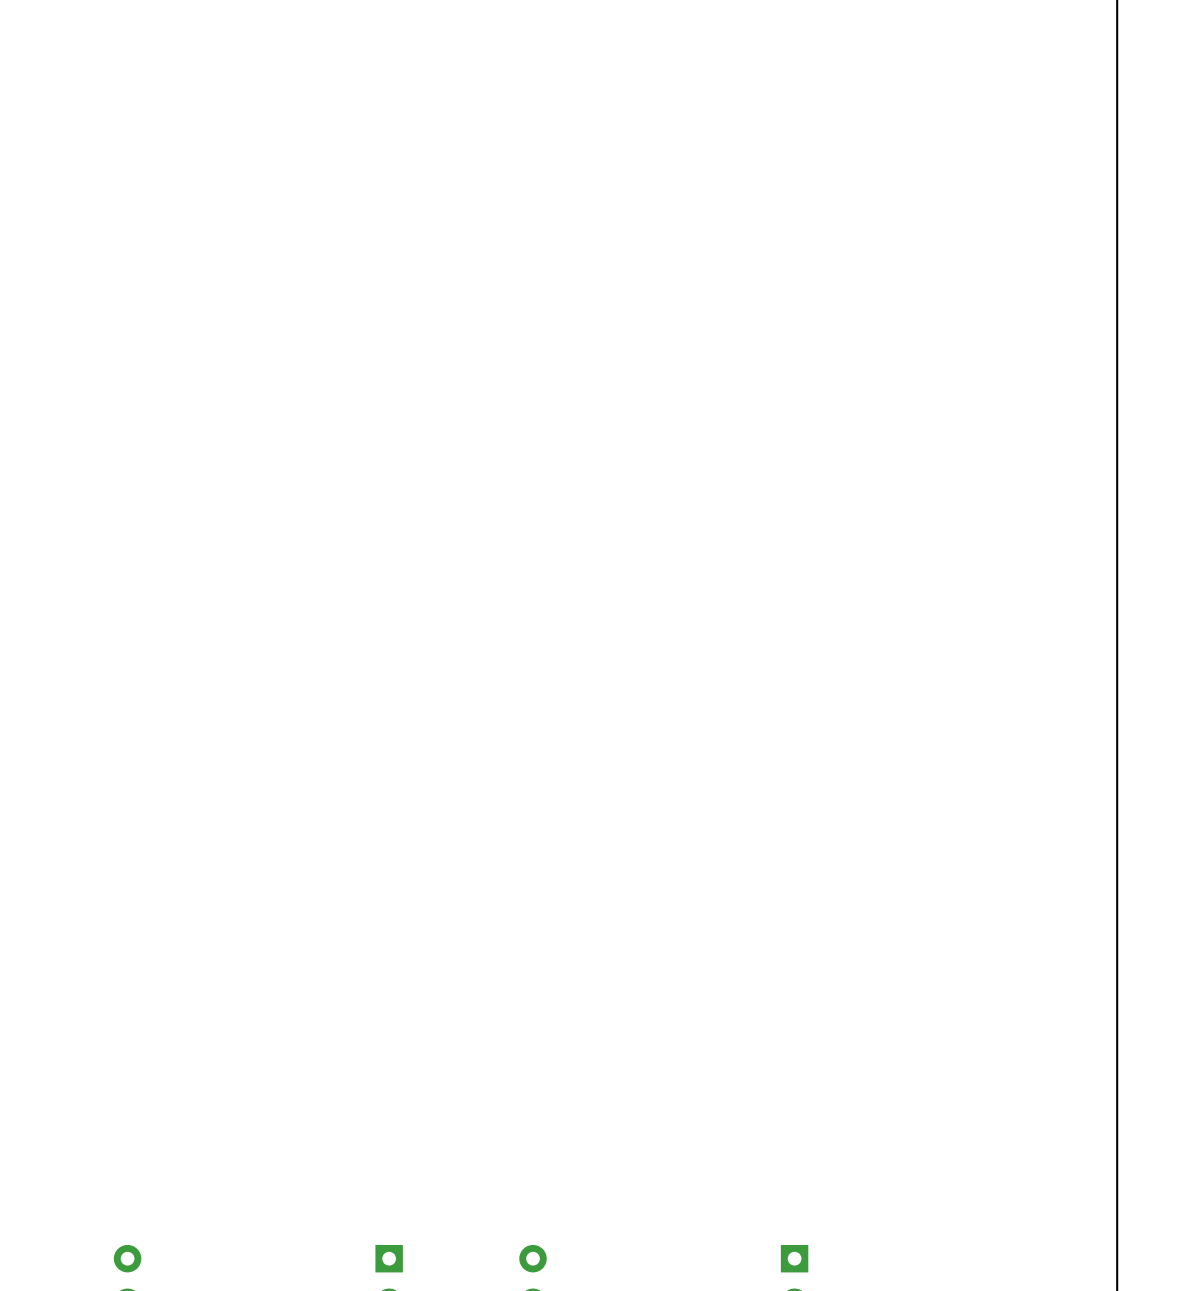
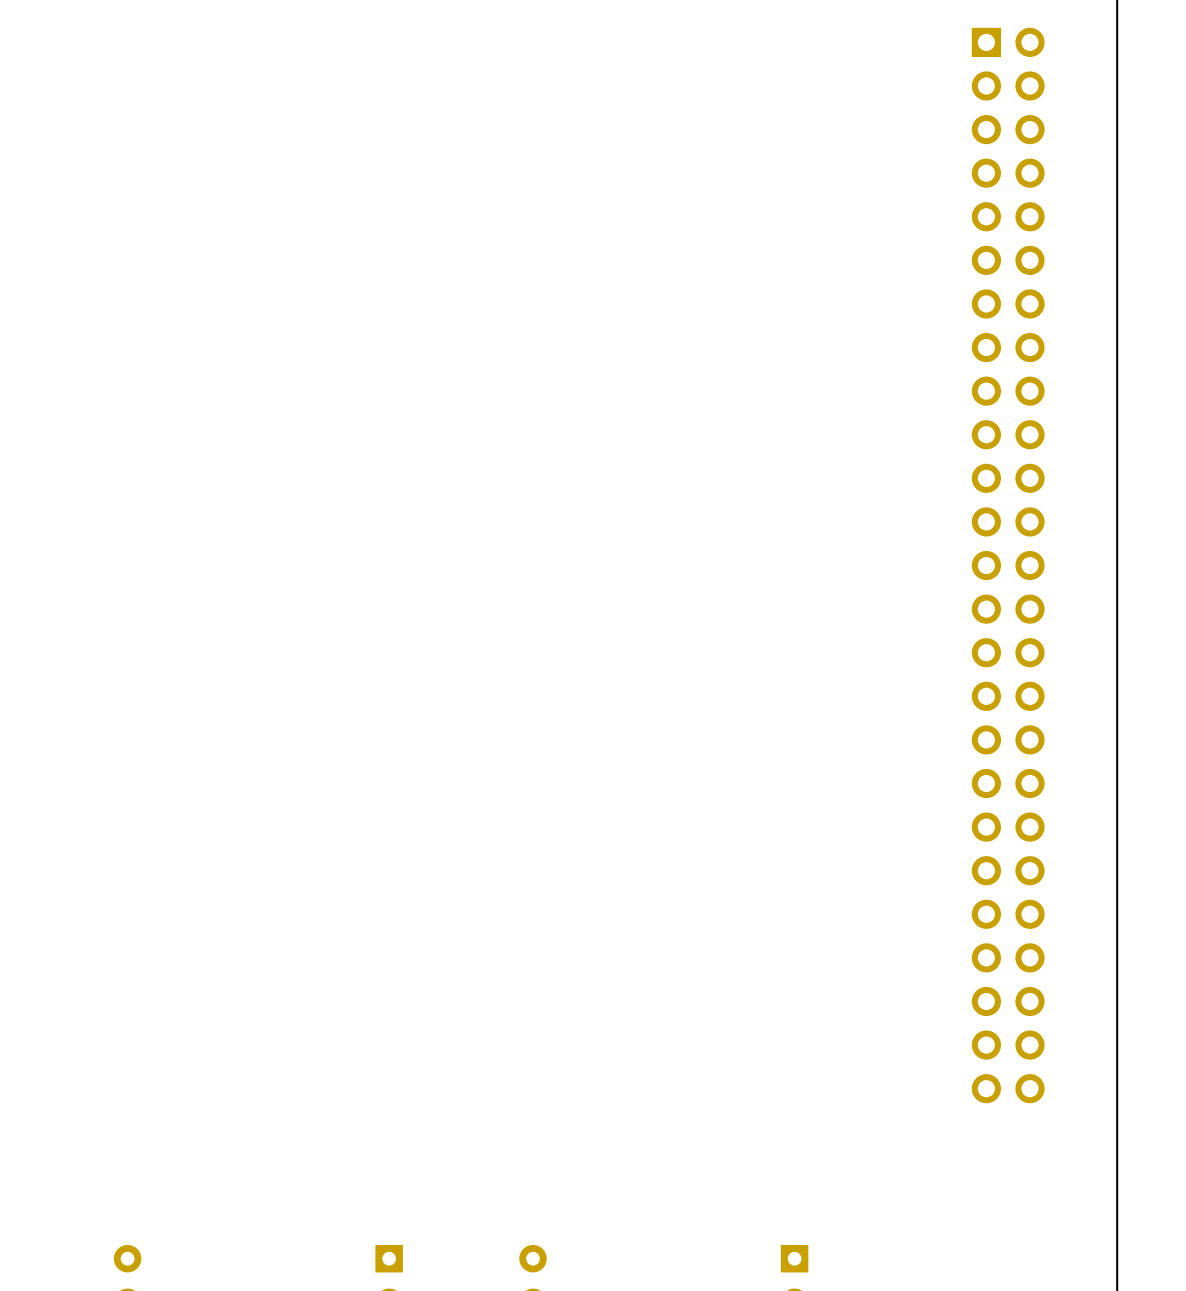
part: none -> (1008, 565)

